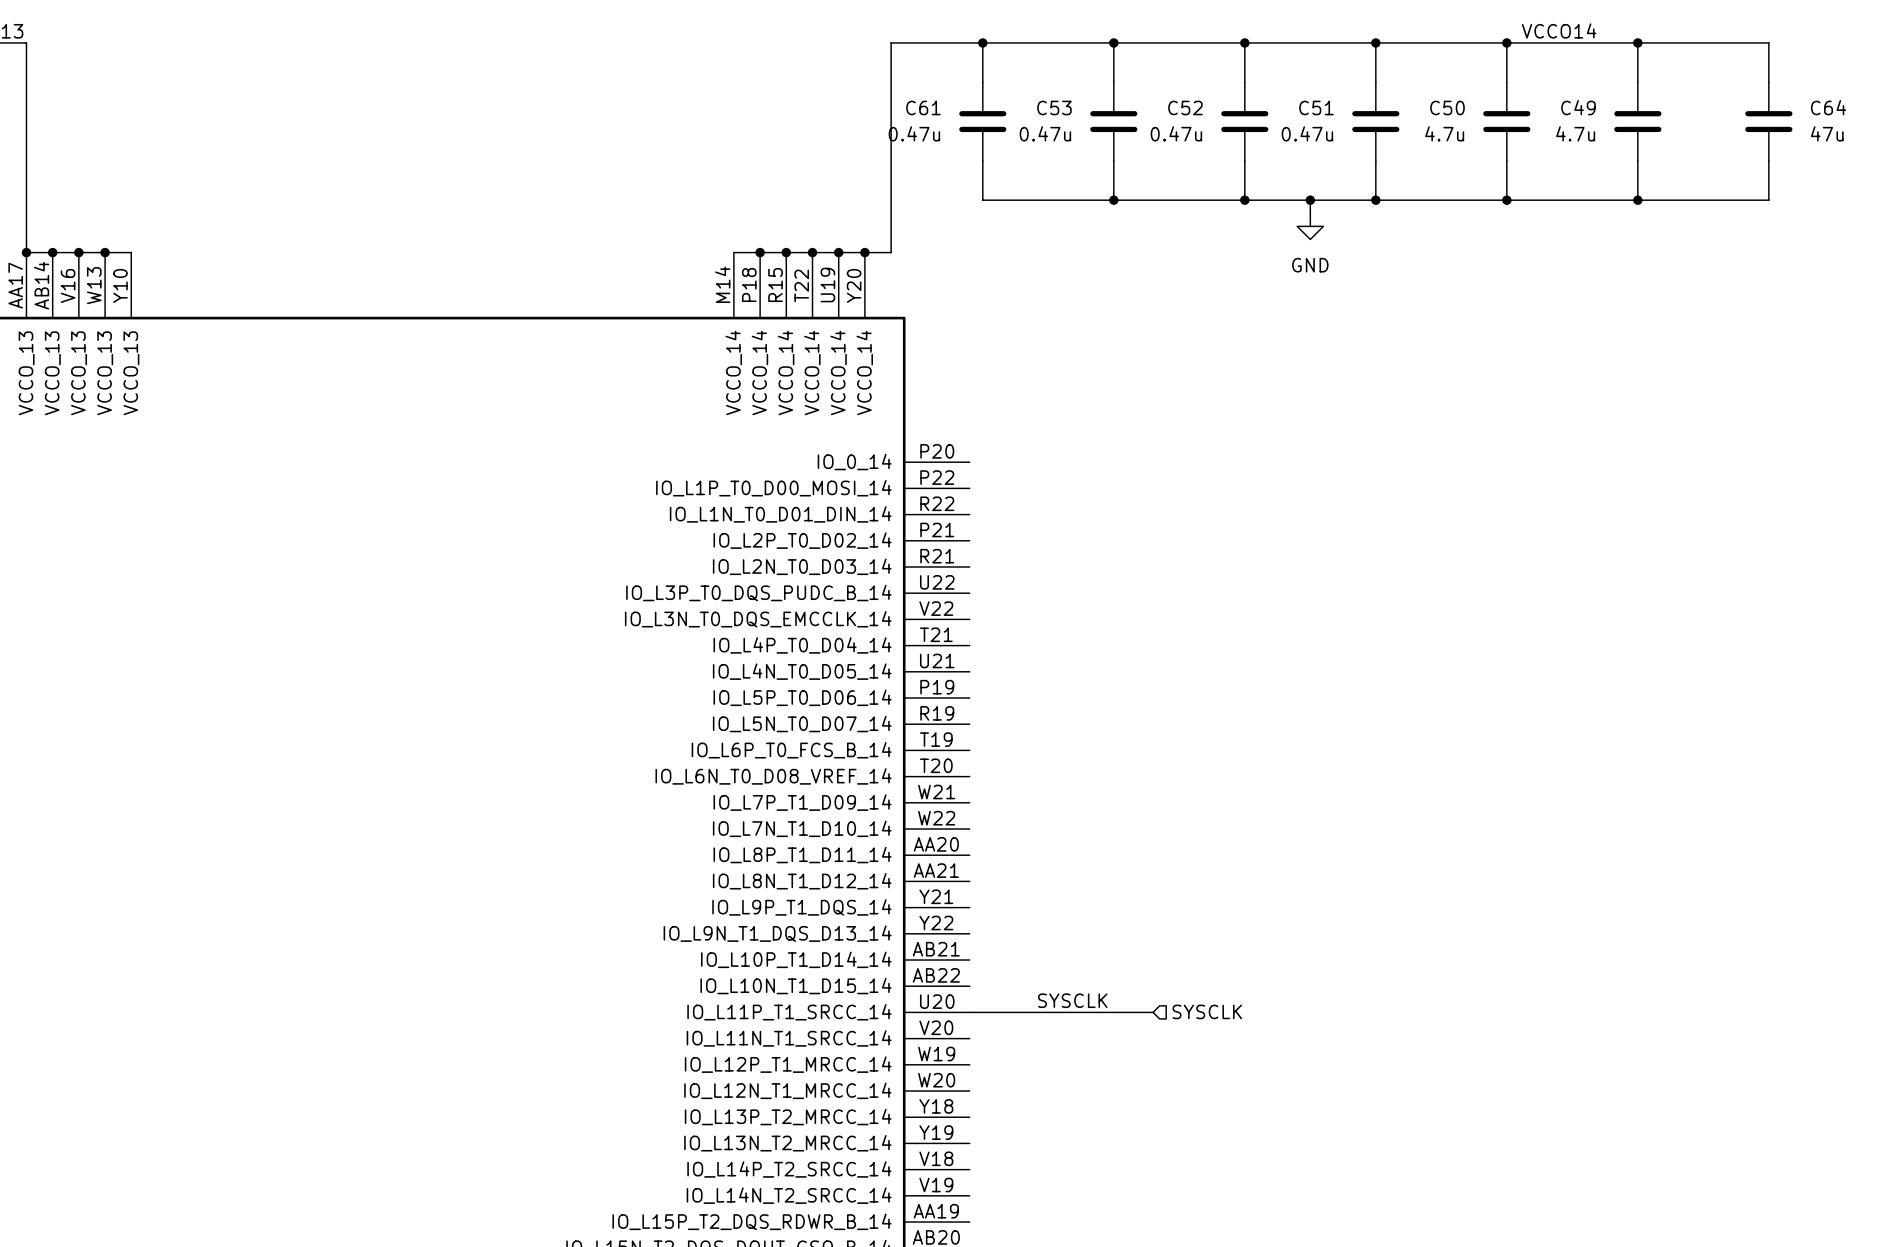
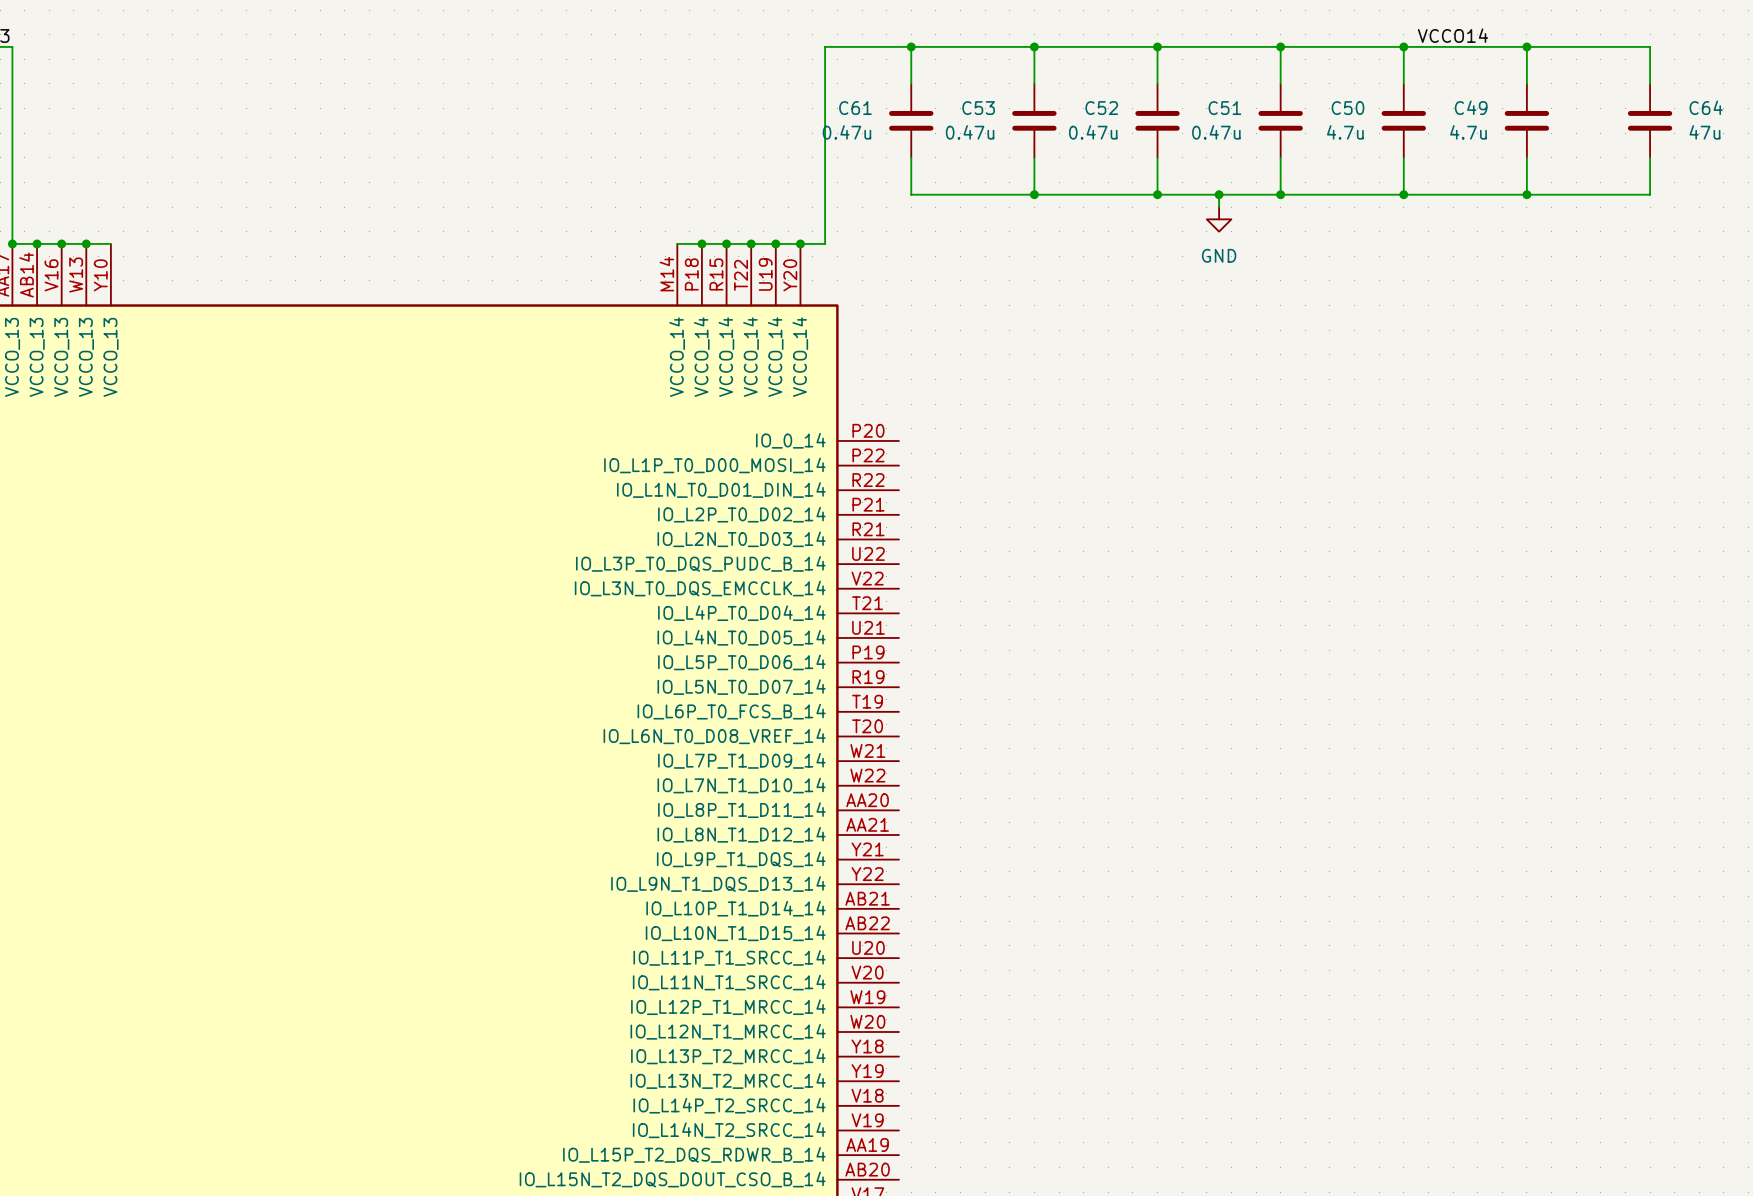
label: SYSCLK (1072, 1000) -> none
hierarchical label: SYSCLK (1207, 1011) -> none
wire: (969, 1012) (1153, 1012) -> none

